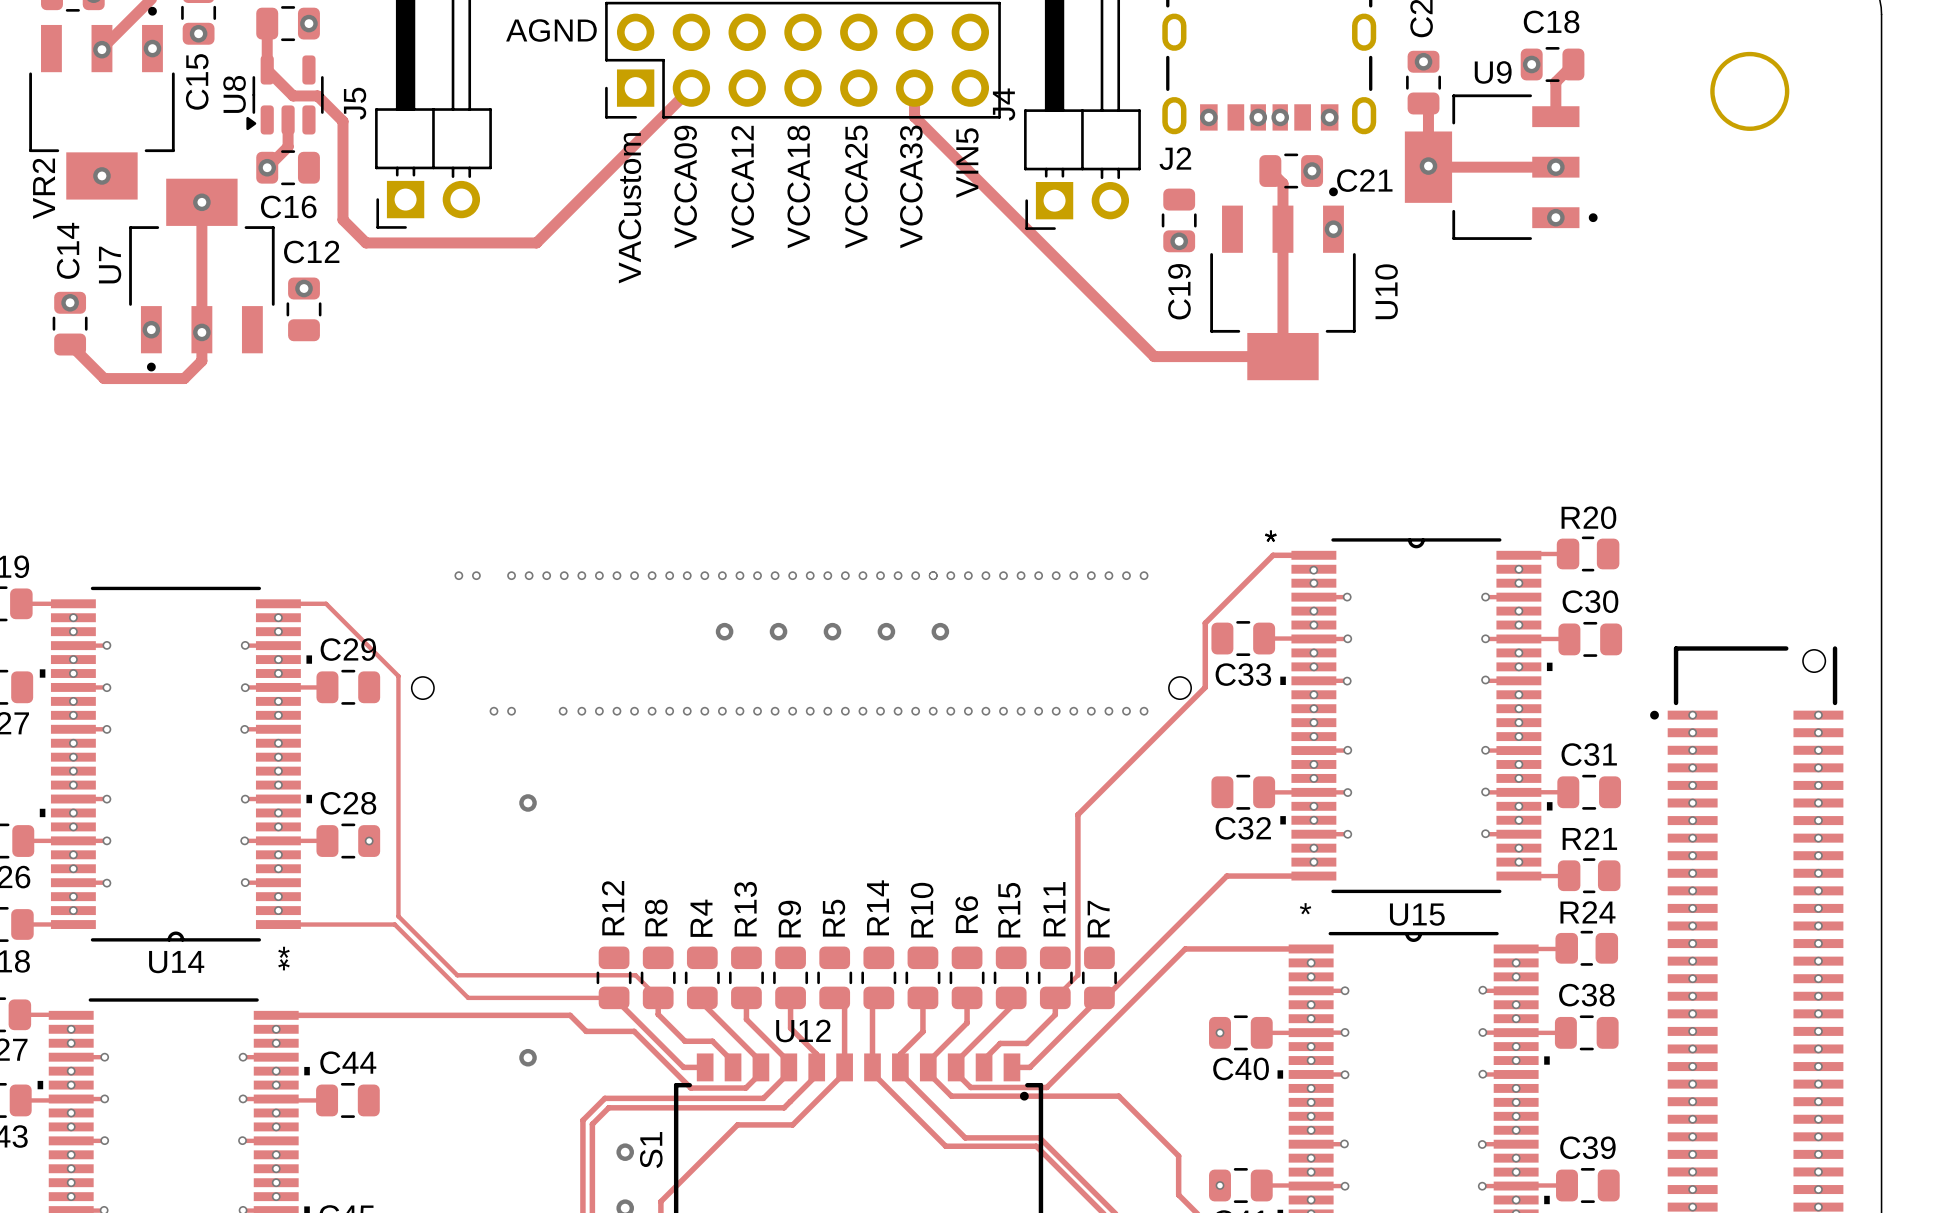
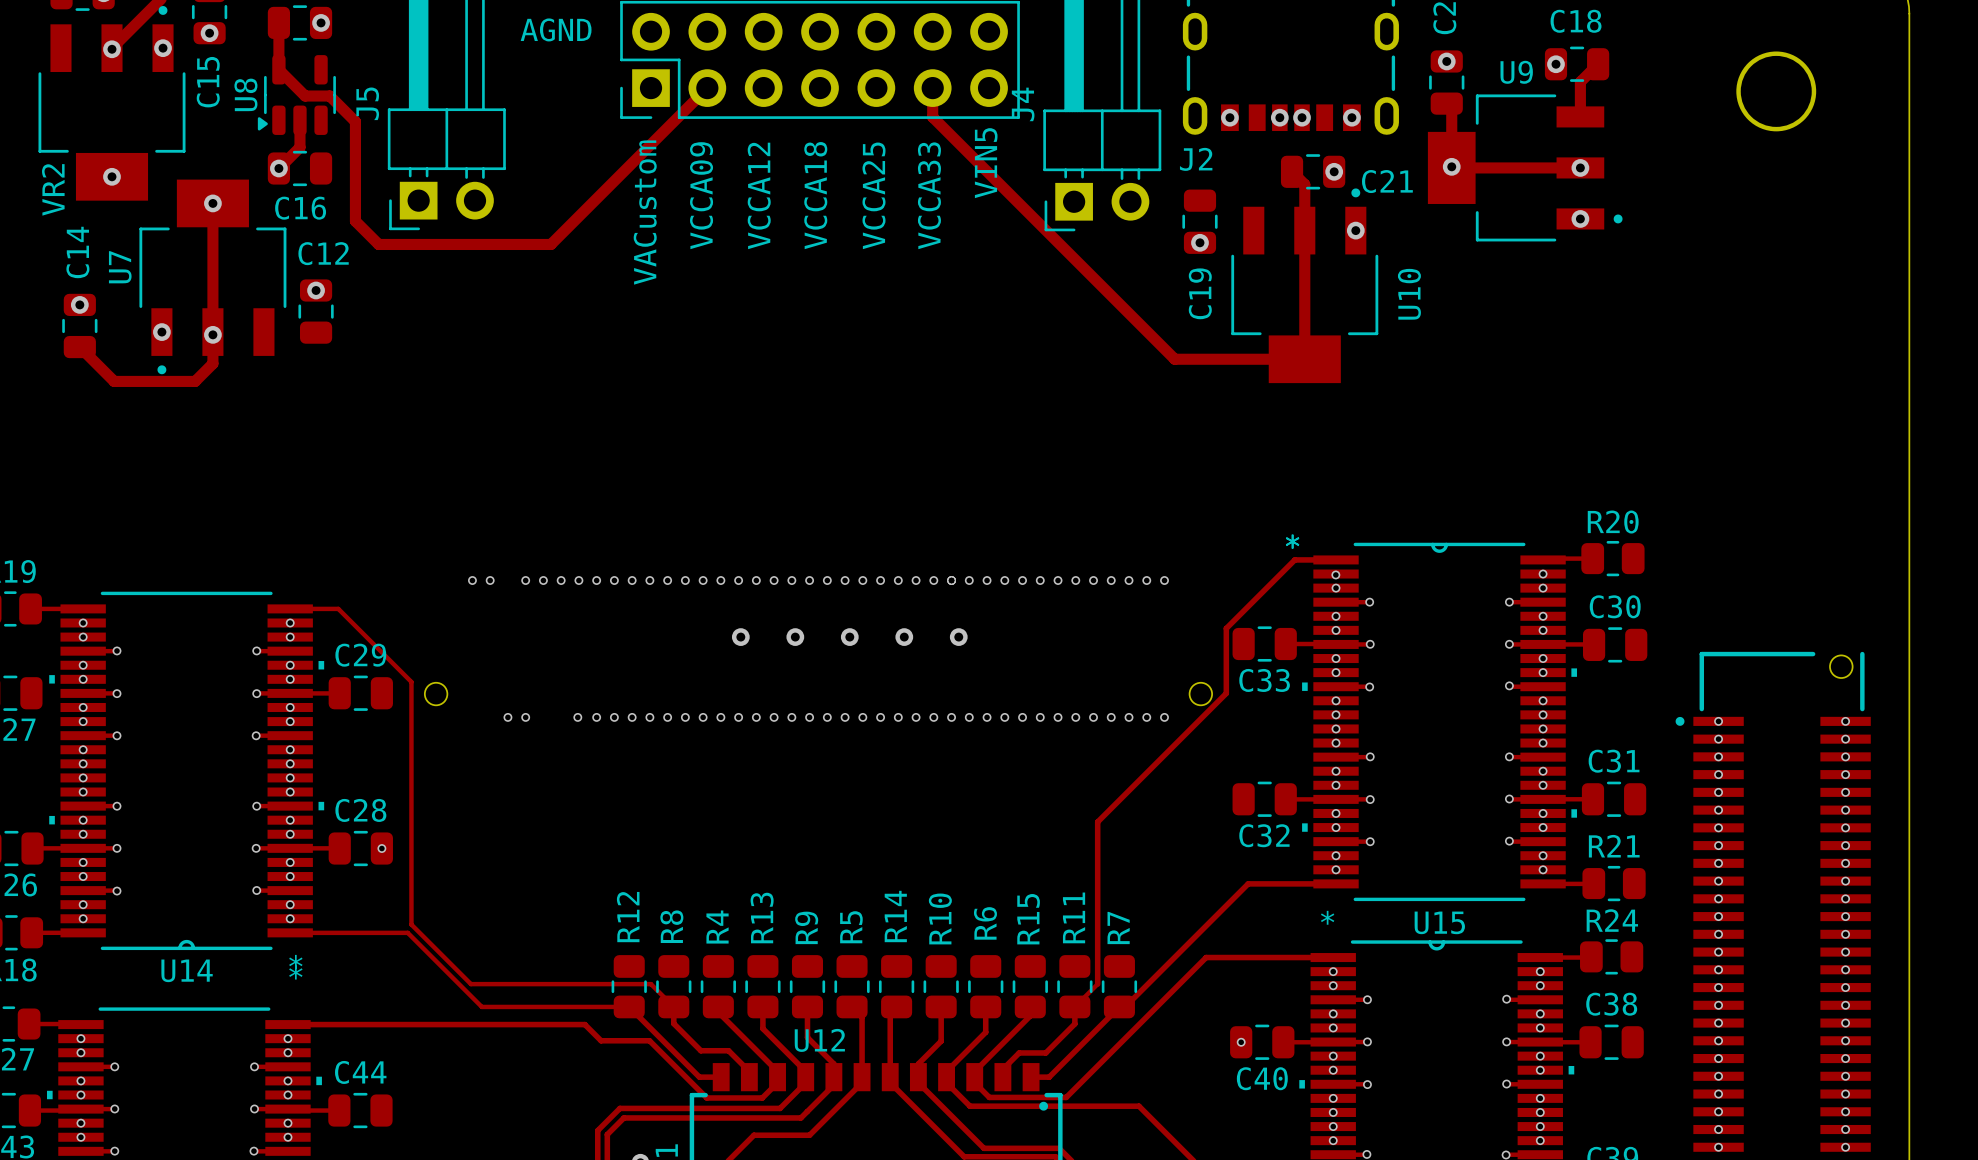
via: (528, 802) -> none
via: (528, 1057) -> none

